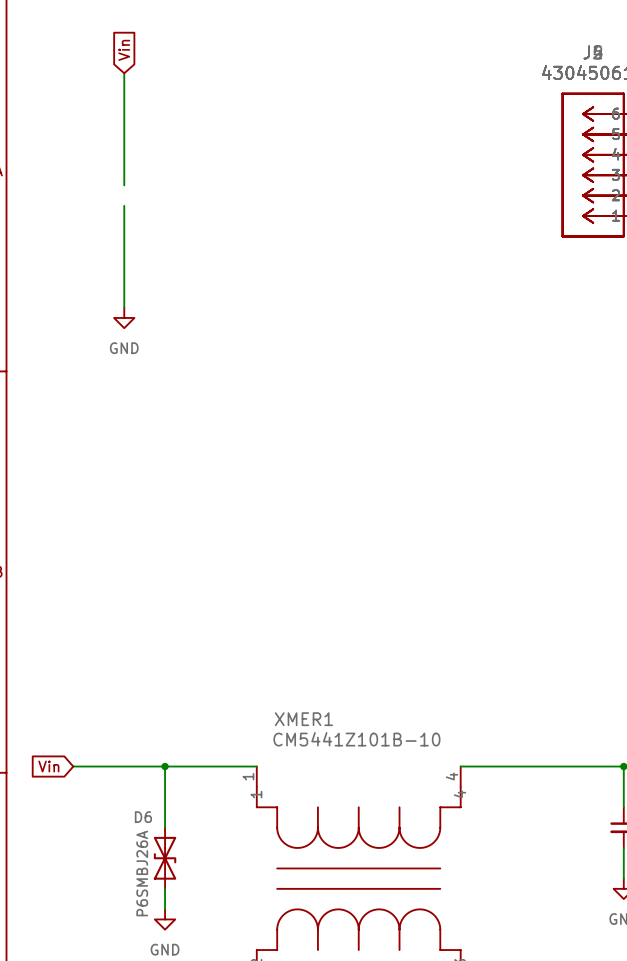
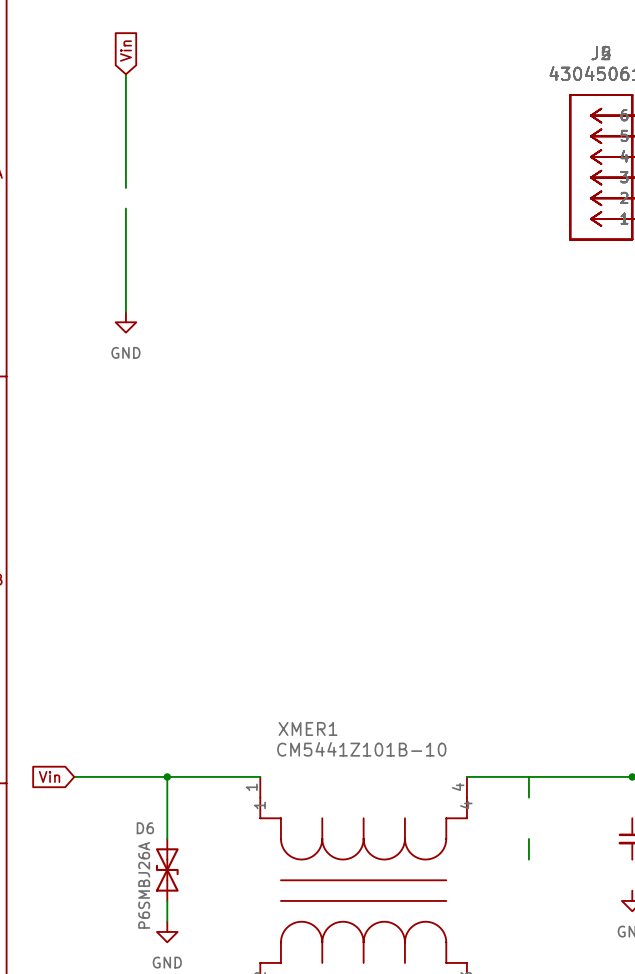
wire: none -> (528, 776) (528, 797)
wire: (623, 766) (623, 807) -> none
wire: none -> (528, 838) (528, 859)
wire: (623, 848) (623, 878) -> none

